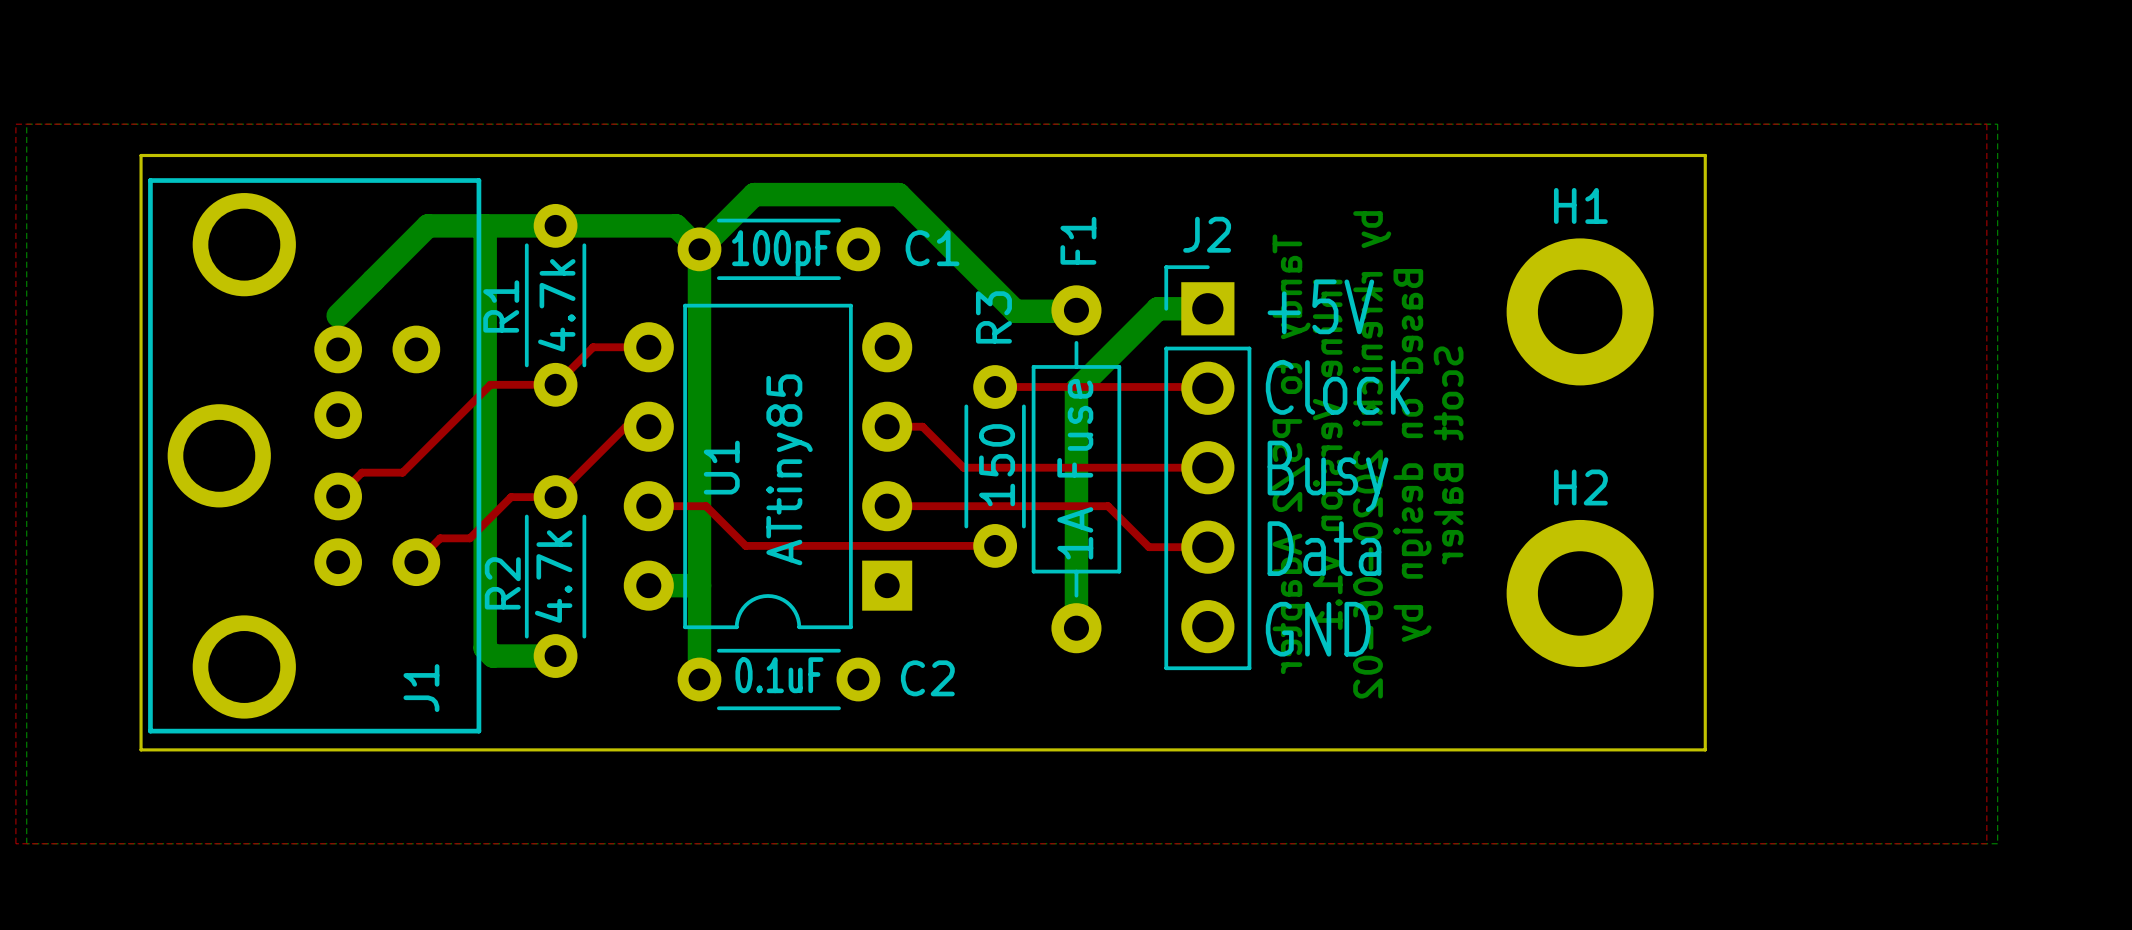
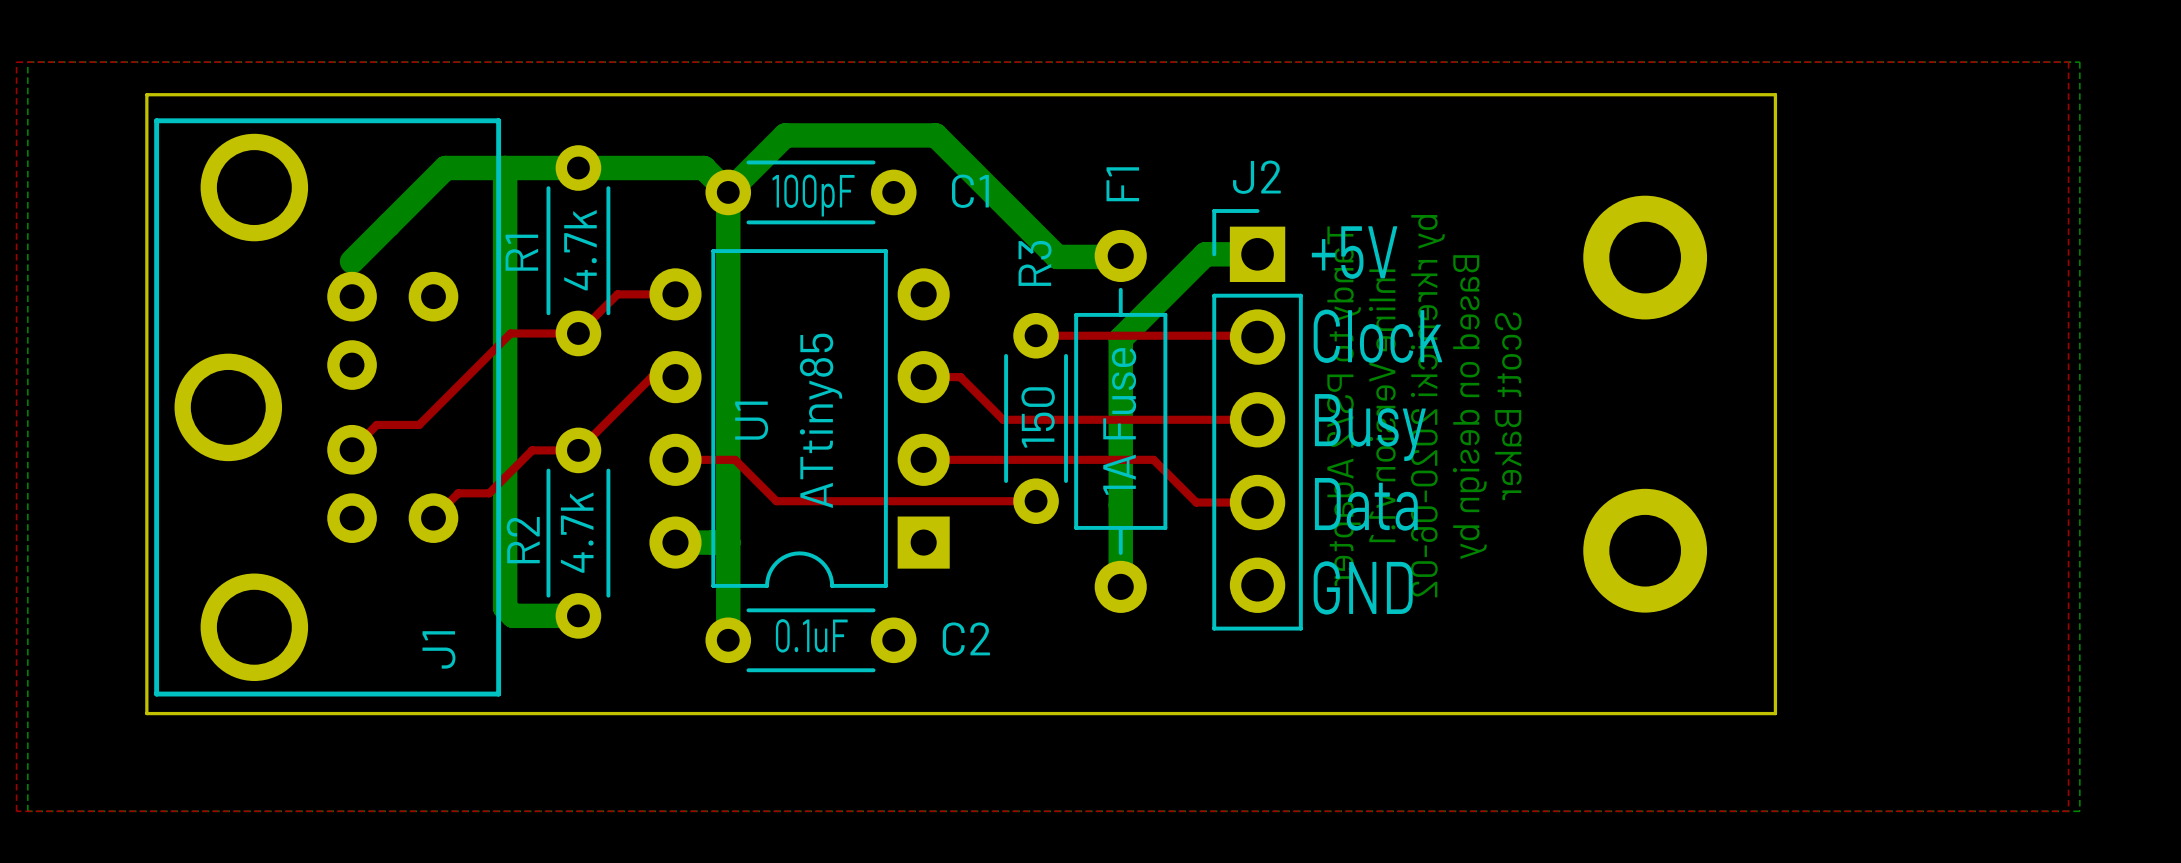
H1: (1580, 311) -> none
part: none -> (1645, 257)
H2: (1580, 593) -> none
part: none -> (1645, 550)

